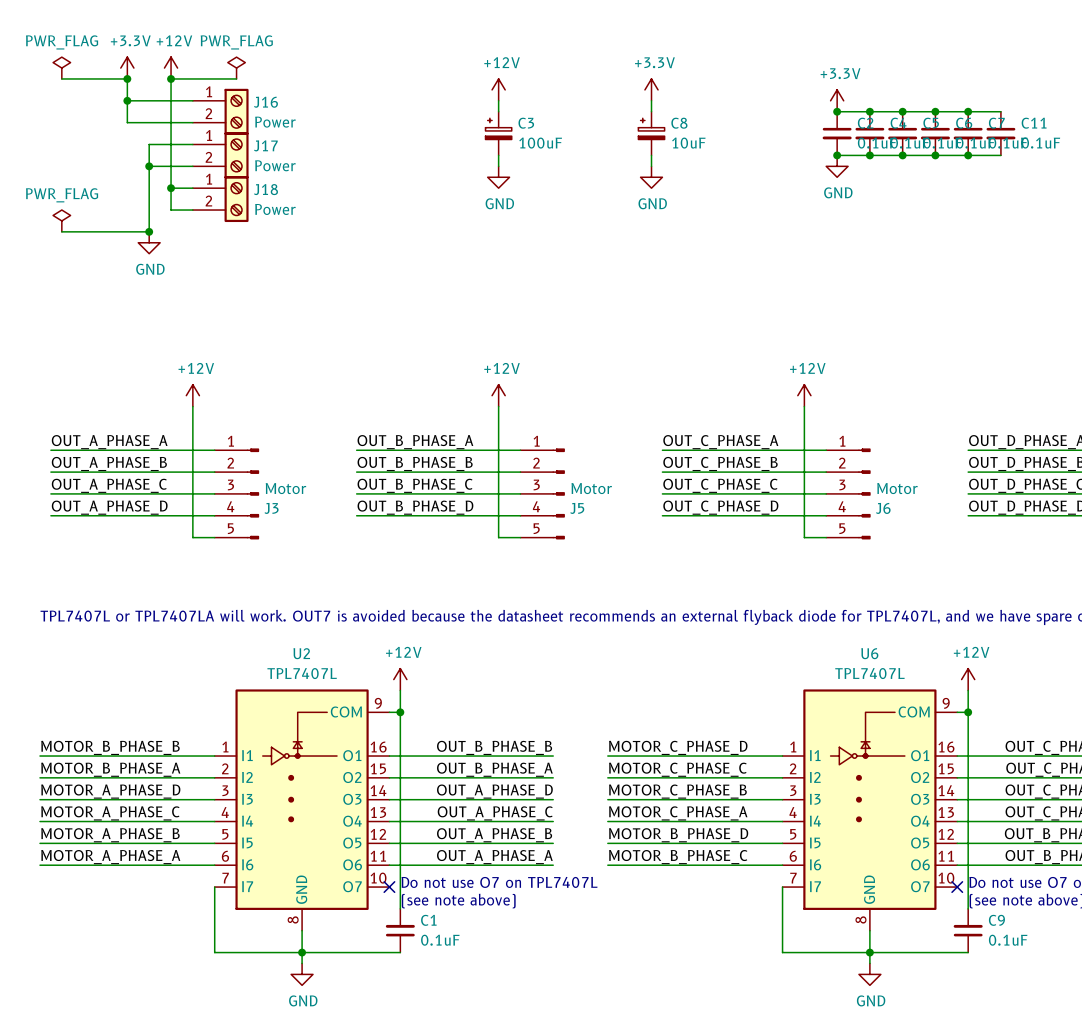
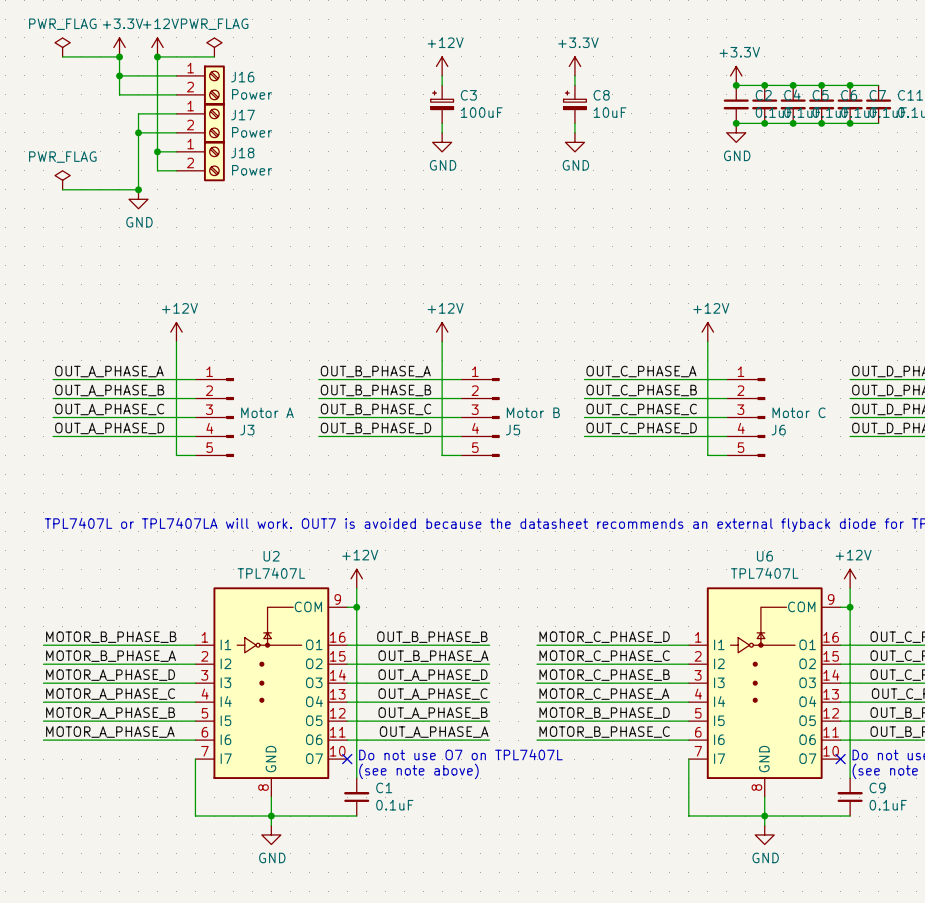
J3 value: Motor (285, 488) -> Motor A (267, 412)
J5 value: Motor (591, 488) -> Motor B (533, 412)
J6 value: Motor (897, 488) -> Motor C (799, 412)

